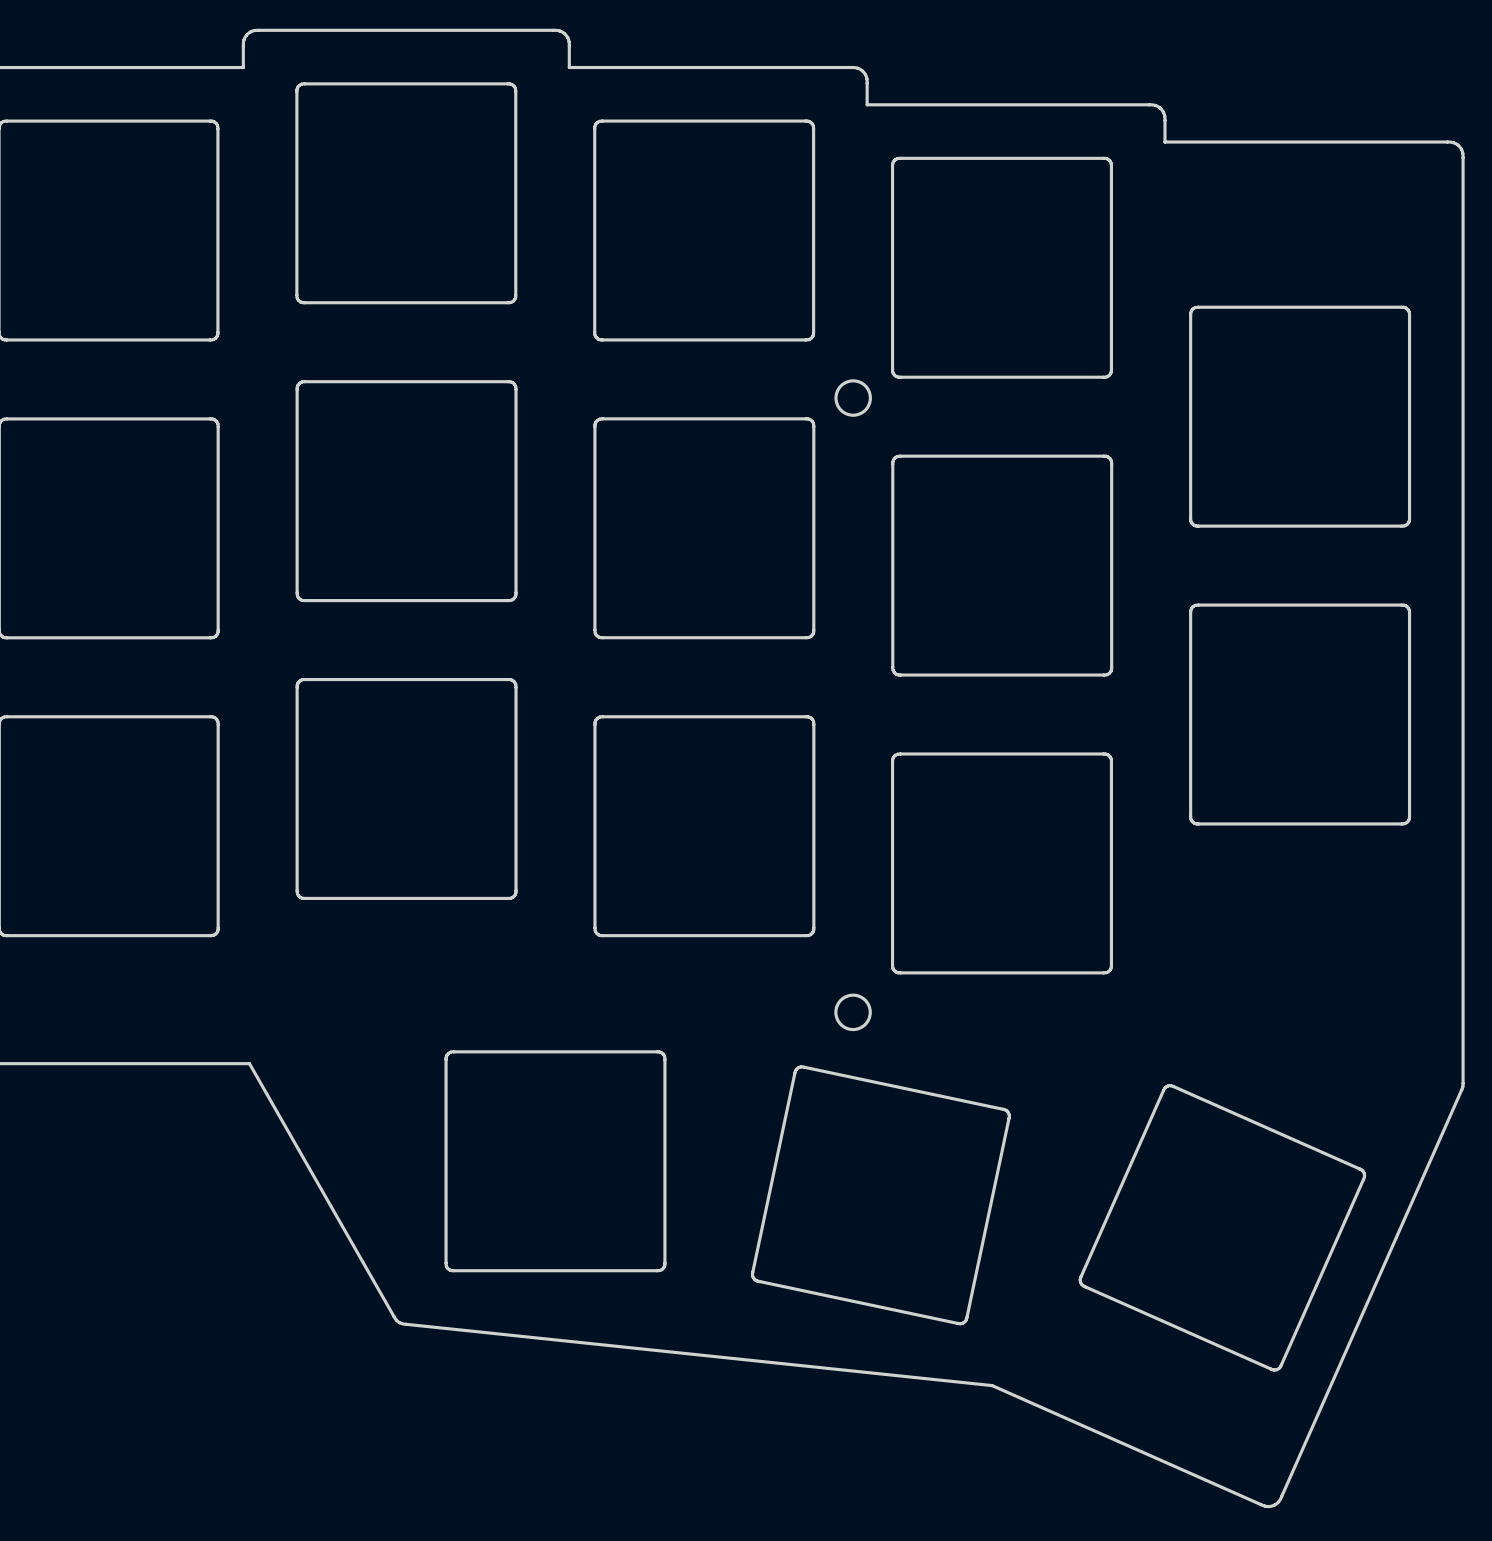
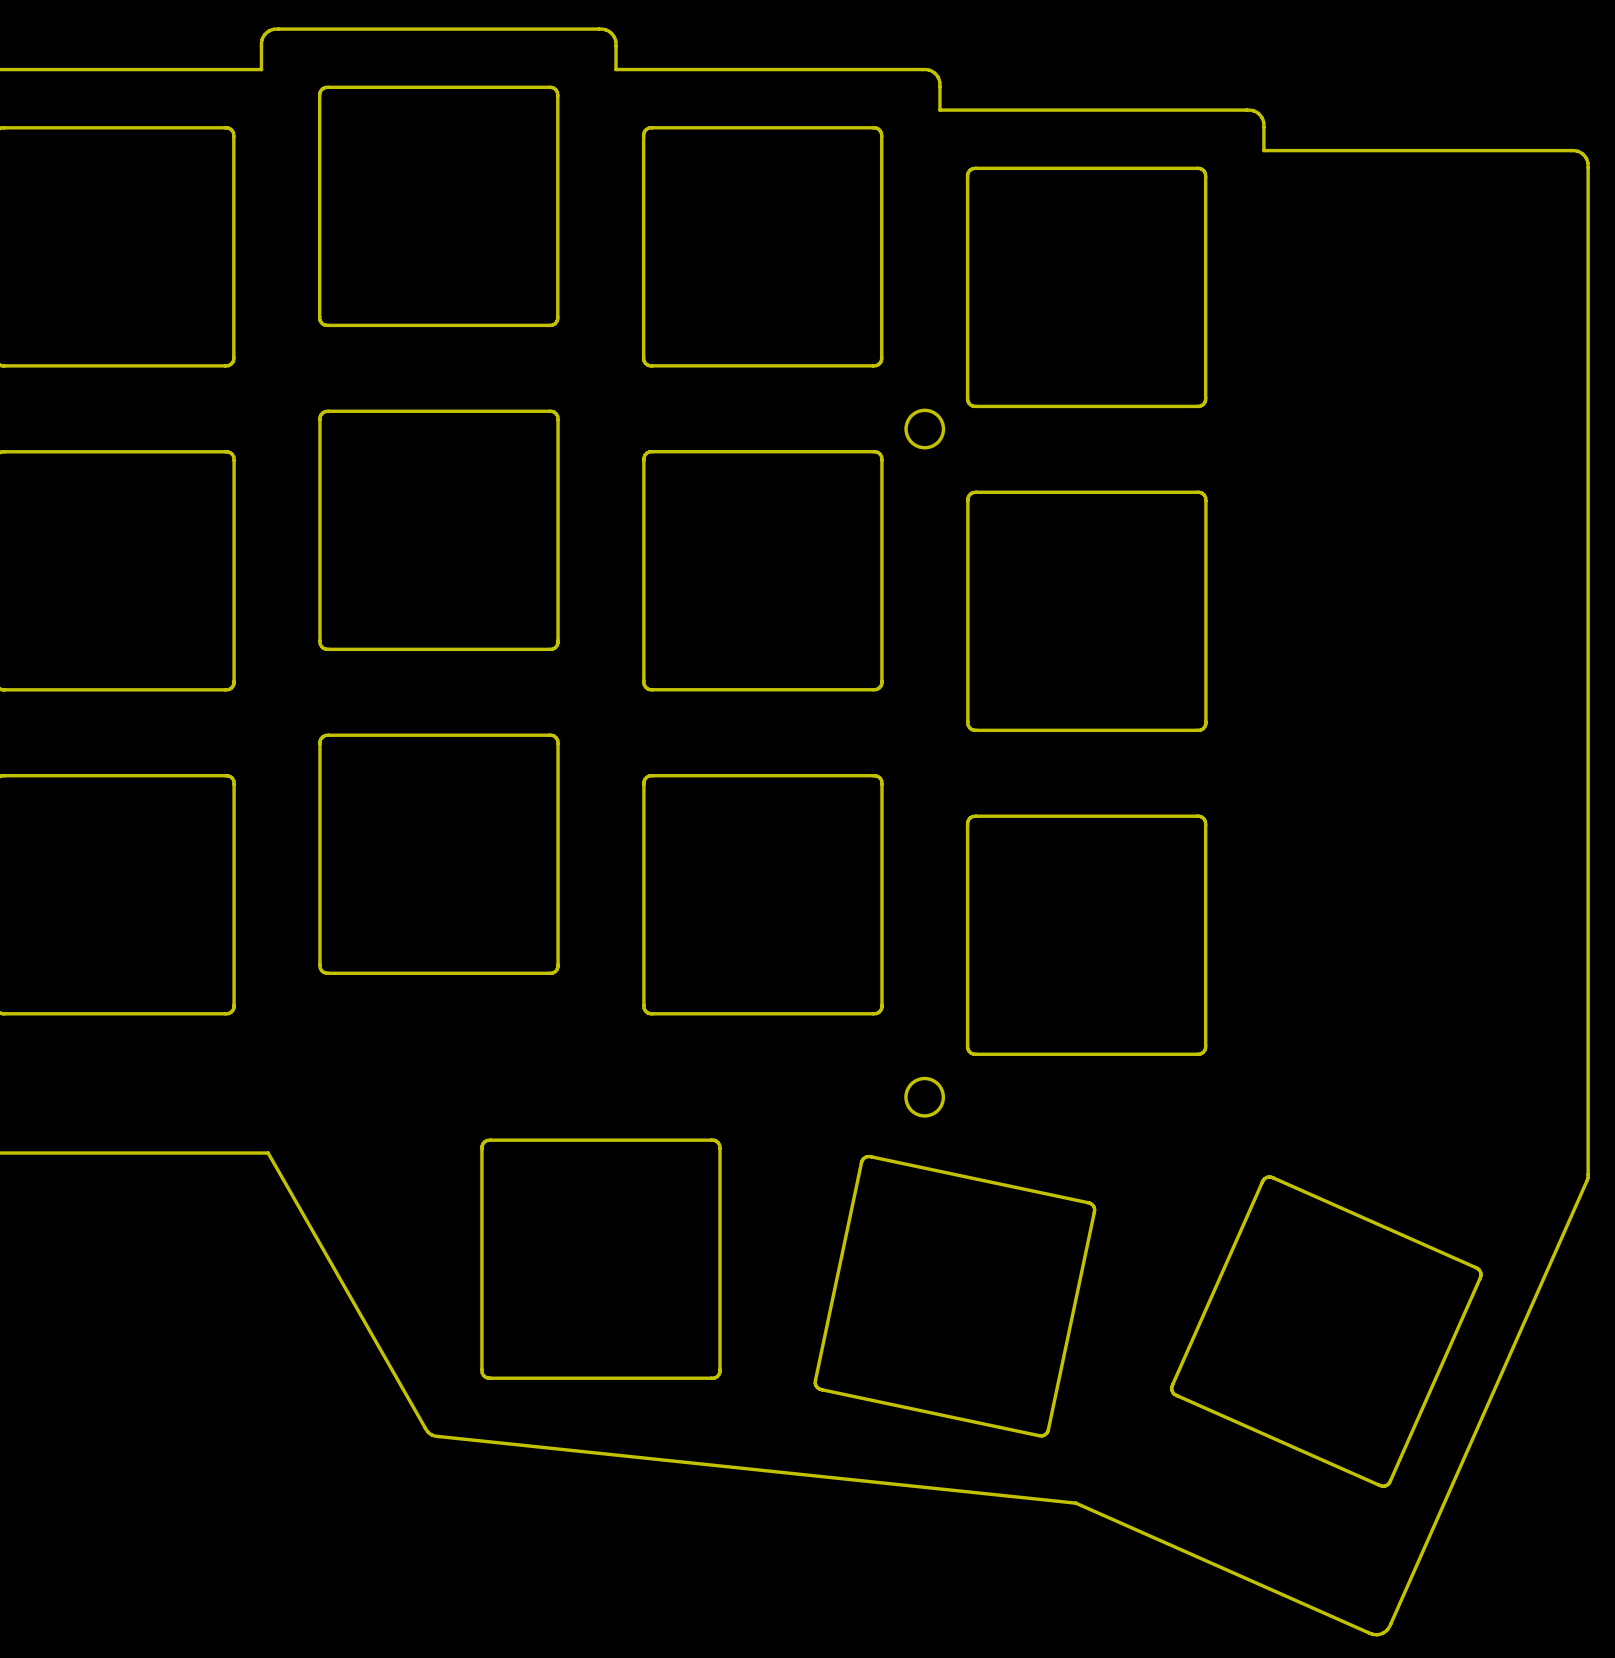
board edge: (1198, 307) (1402, 307) (1407, 309) (1409, 314) (1409, 518) (1407, 524) (1402, 526) (1198, 526) (1192, 523) (1190, 518) (1190, 314) (1192, 309) (1198, 307) -> none
board edge: (1198, 605) (1402, 605) (1407, 607) (1409, 612) (1409, 816) (1407, 822) (1402, 823) (1198, 823) (1192, 821) (1190, 816) (1190, 612) (1192, 606) (1198, 605) -> none

